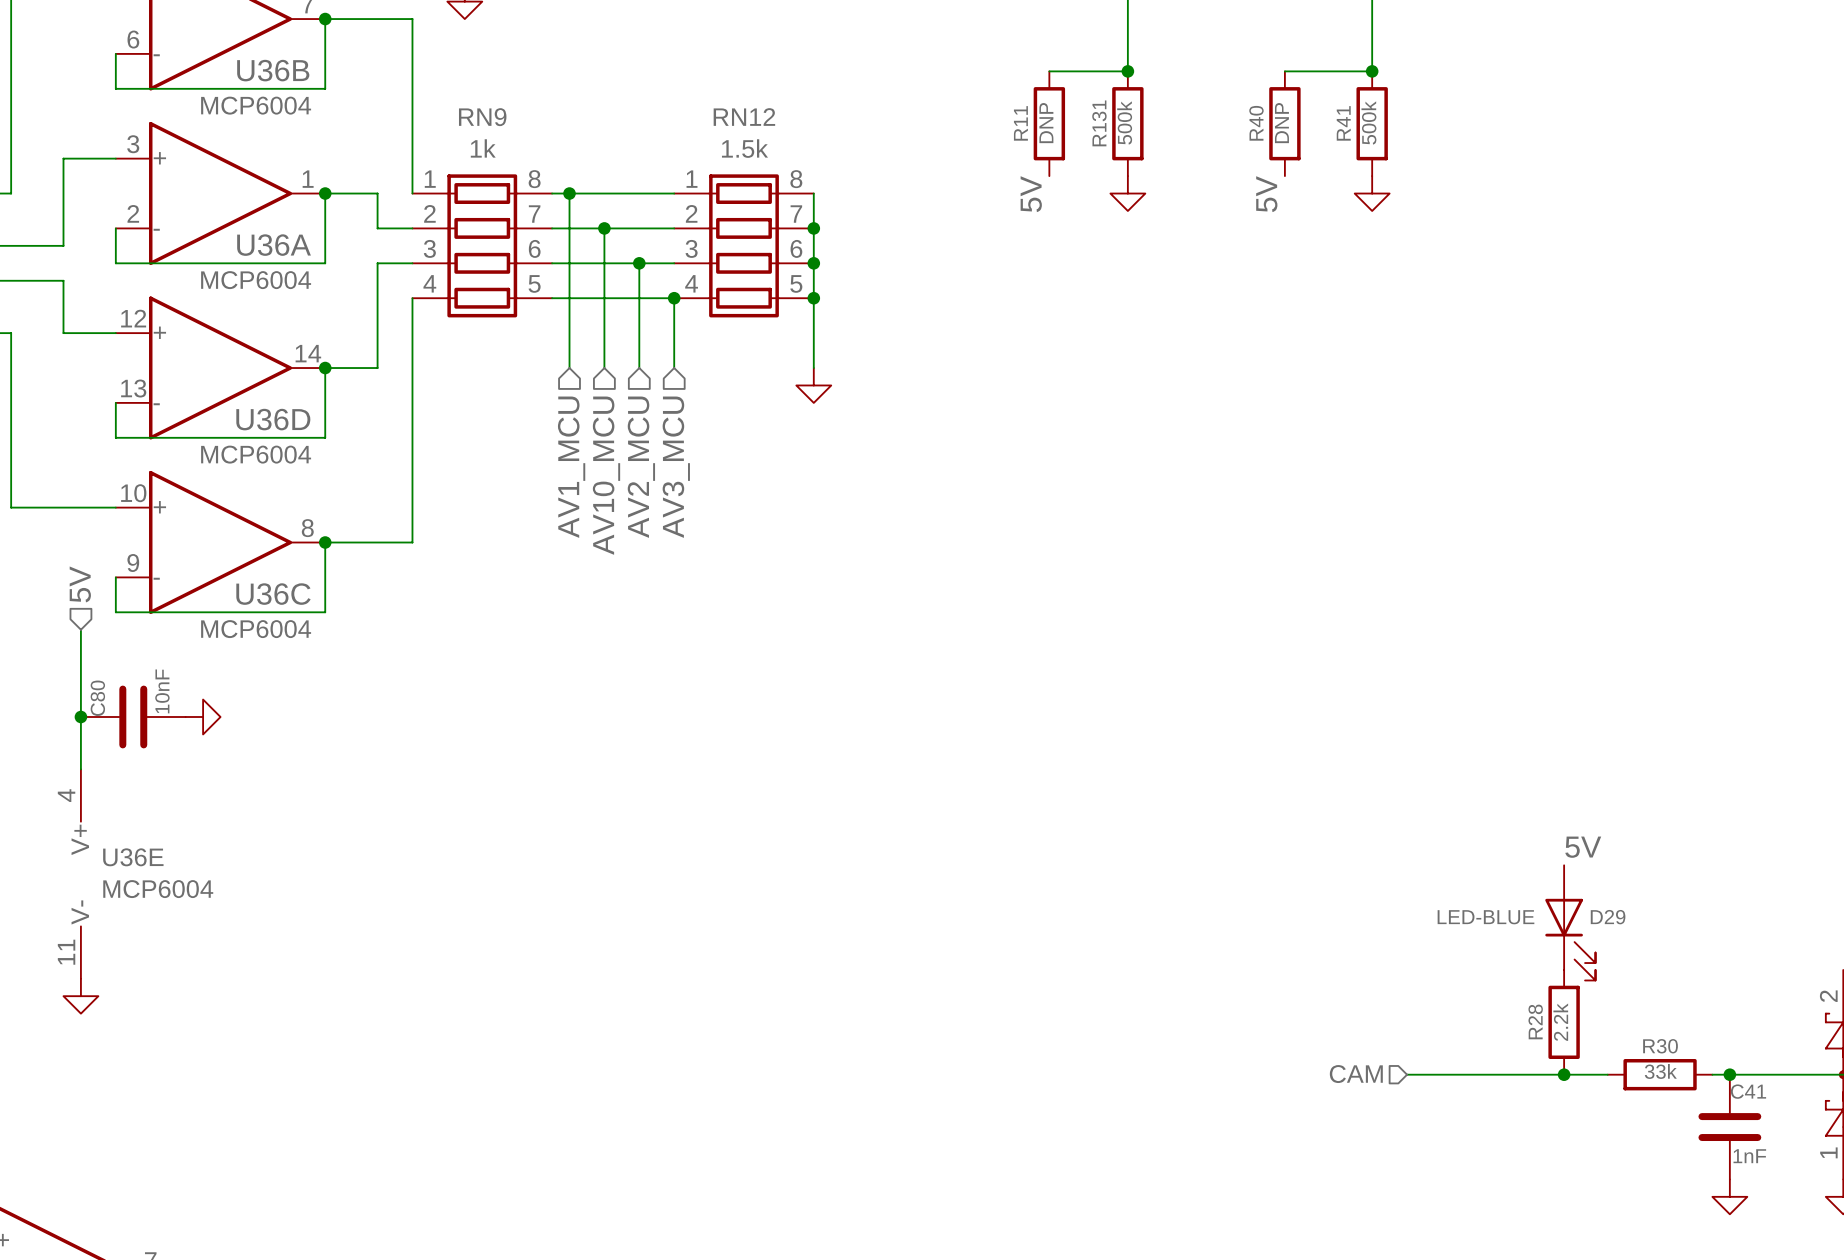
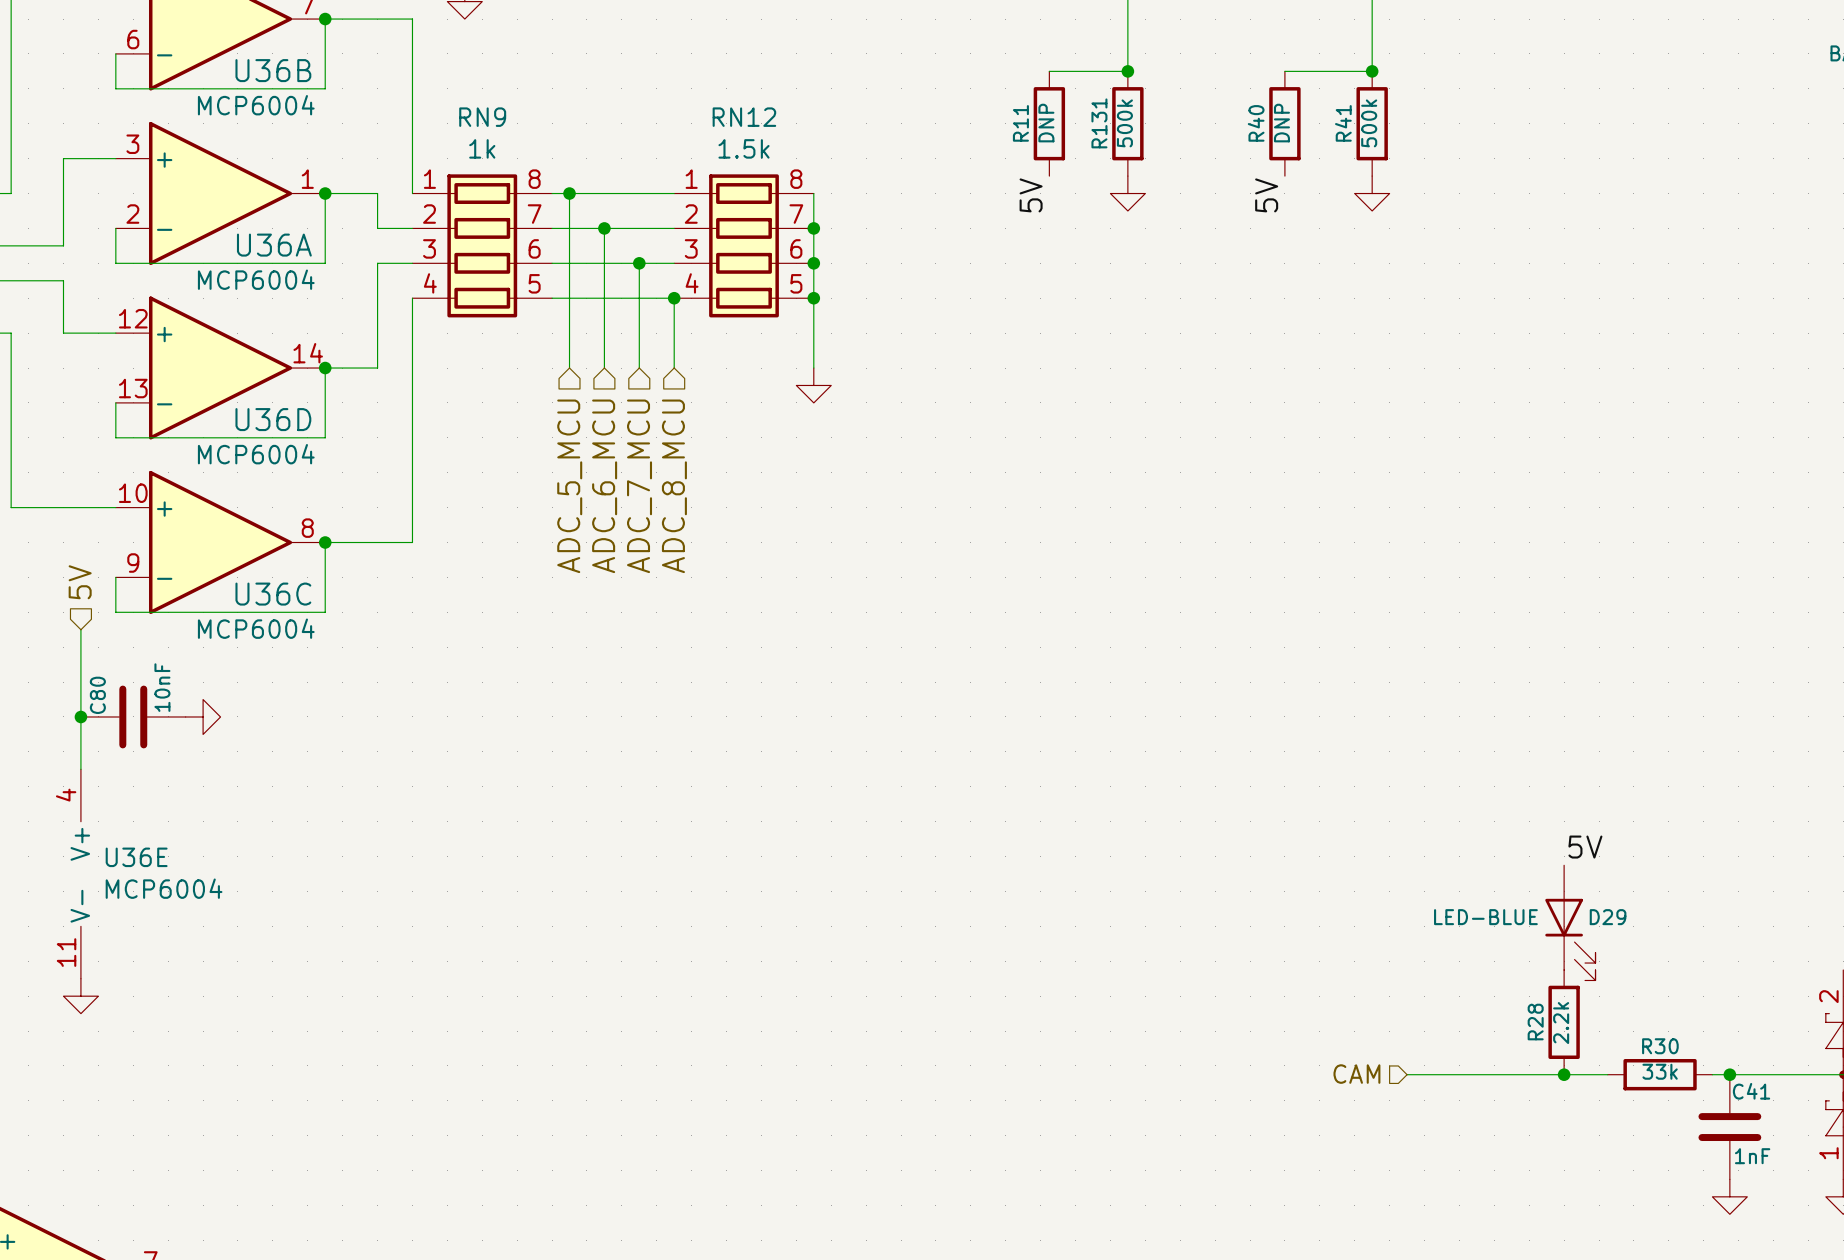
hierarchical label: AV1_MCU (571, 467) -> ADC_5_MCU (569, 486)
hierarchical label: AV2_MCU (641, 467) -> ADC_7_MCU (639, 486)
hierarchical label: AV3_MCU (676, 467) -> ADC_8_MCU (674, 486)
hierarchical label: AV10_MCU (606, 475) -> ADC_6_MCU (604, 486)

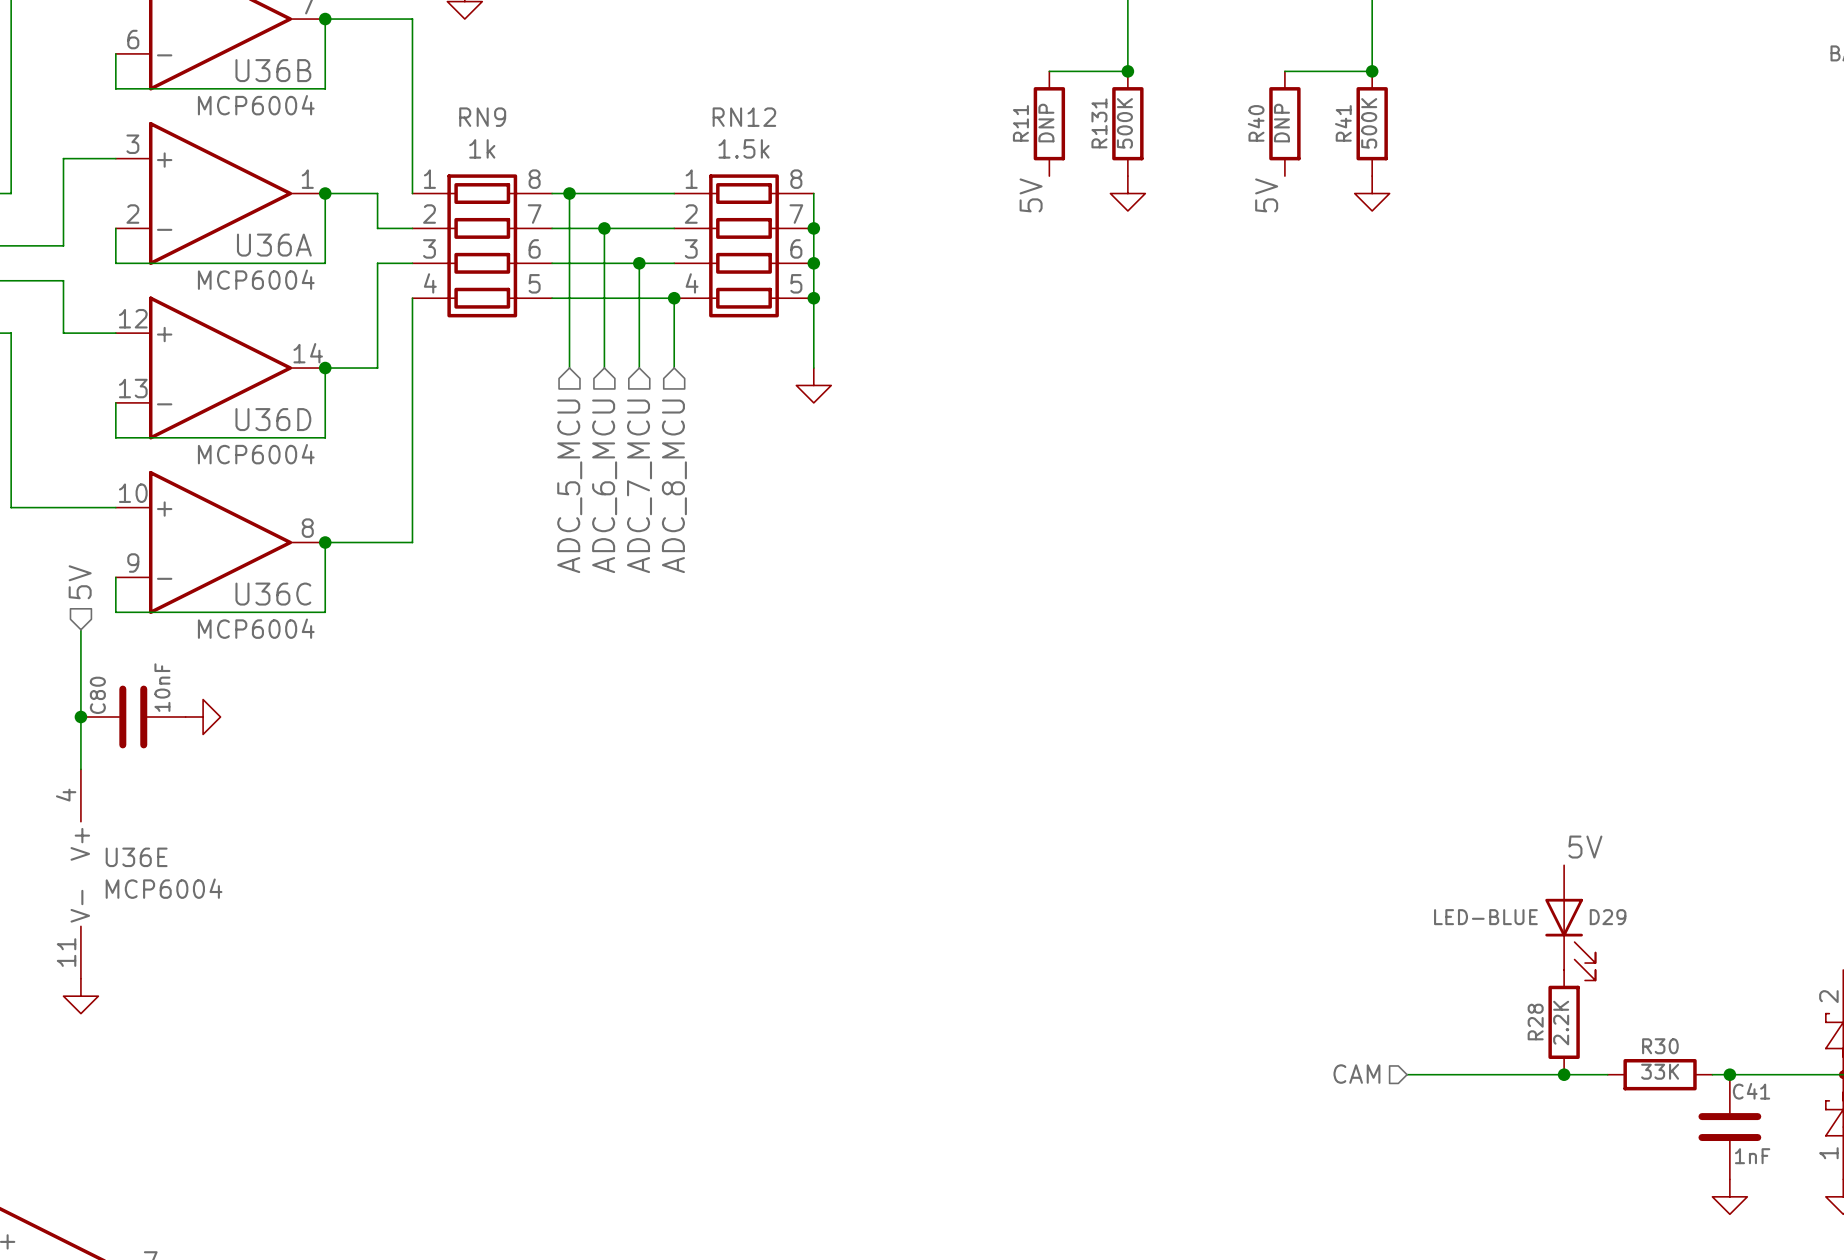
R131 value: 500k (1124, 123) -> 500K (1124, 123)
R41 value: 500k (1369, 123) -> 500K (1369, 123)
R28 value: 2.2k (1561, 1023) -> 2.2K (1561, 1023)
R30 value: 33k (1660, 1071) -> 33K (1660, 1071)

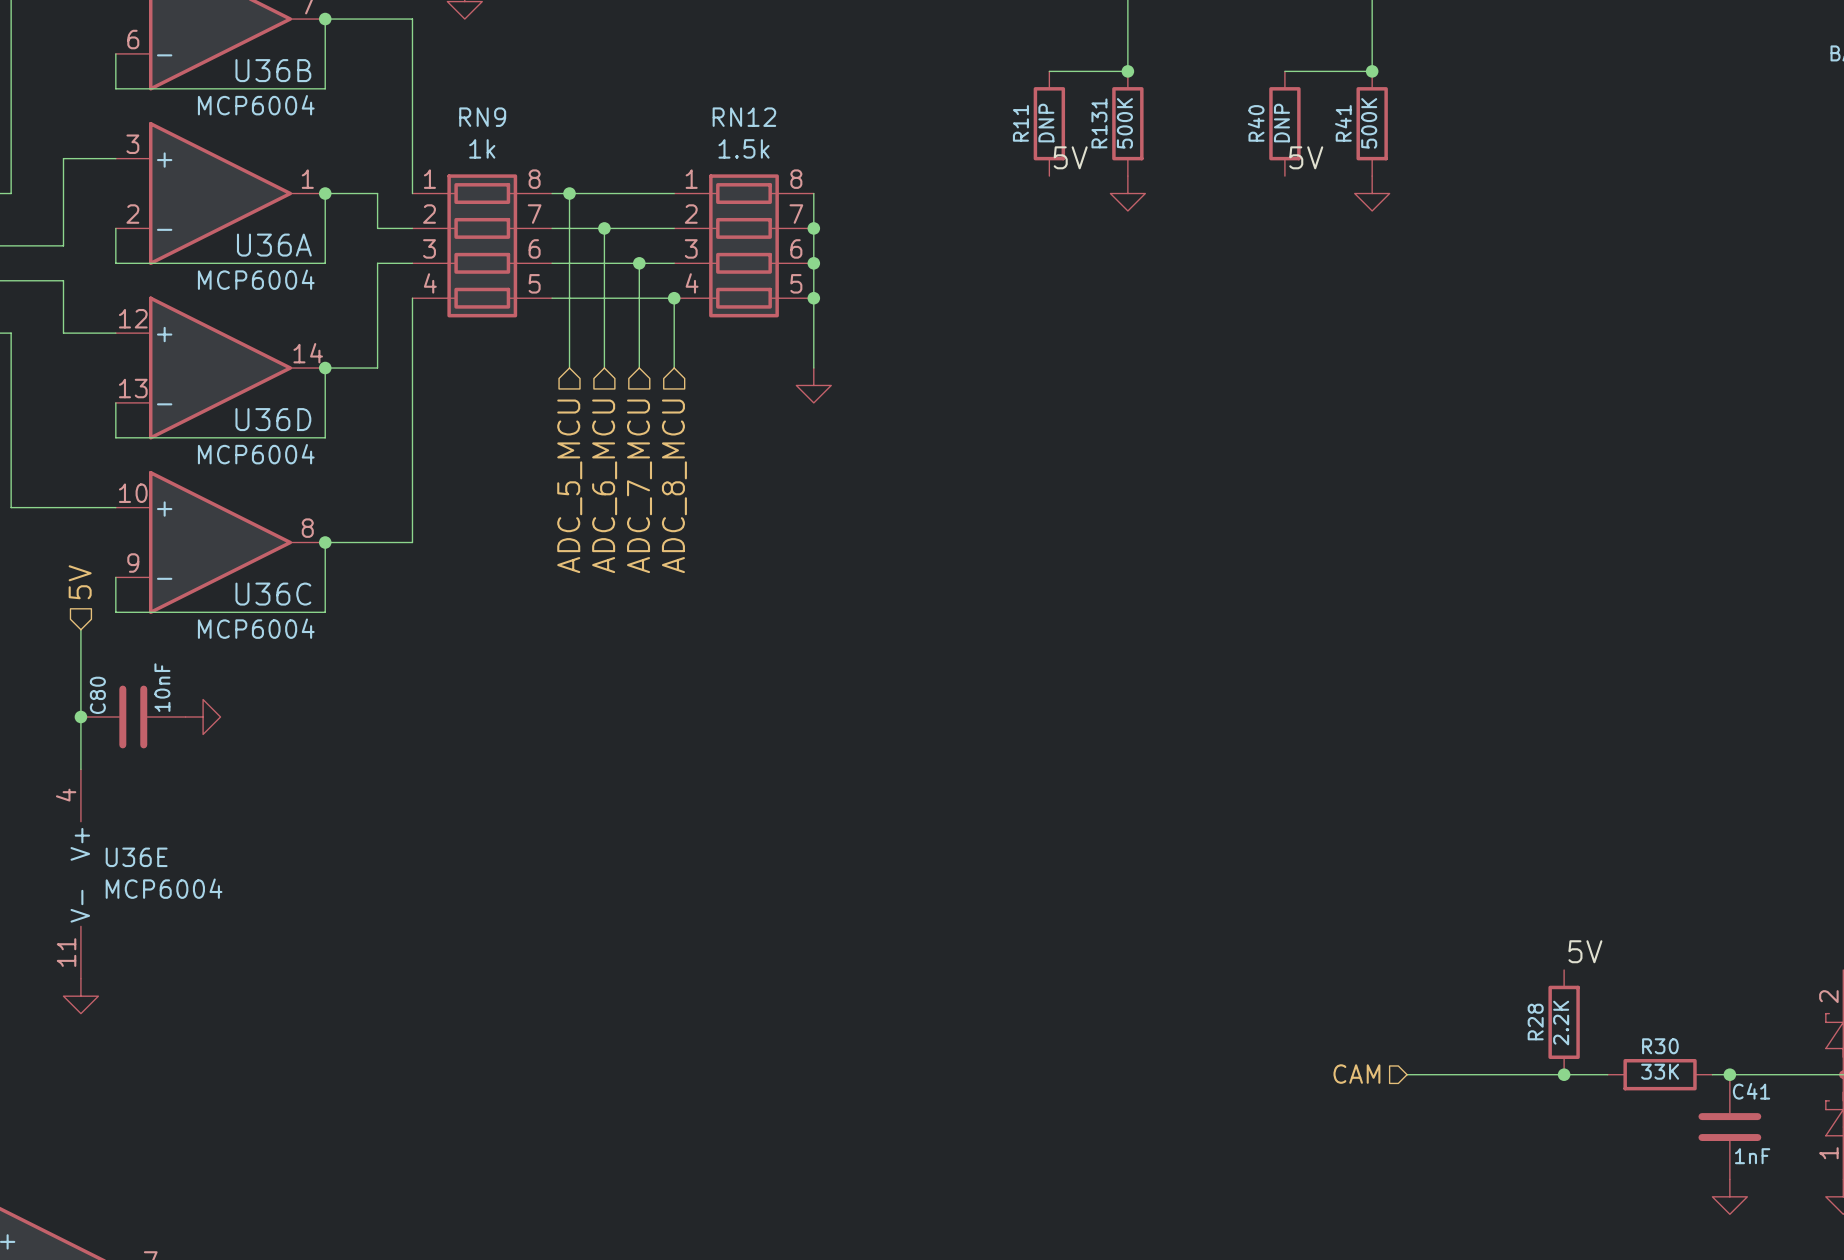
label rotation: 0° (1031, 195) -> 90° clockwise (1070, 157)
label position: 5V (1031, 195) -> 5V (1070, 157)
label rotation: 0° (1266, 195) -> 90° clockwise (1306, 157)
label position: 5V (1266, 195) -> 5V (1306, 157)
label position: 5V (1585, 847) -> 5V (1585, 951)
D29: LED-BLUE (1570, 922) -> none

